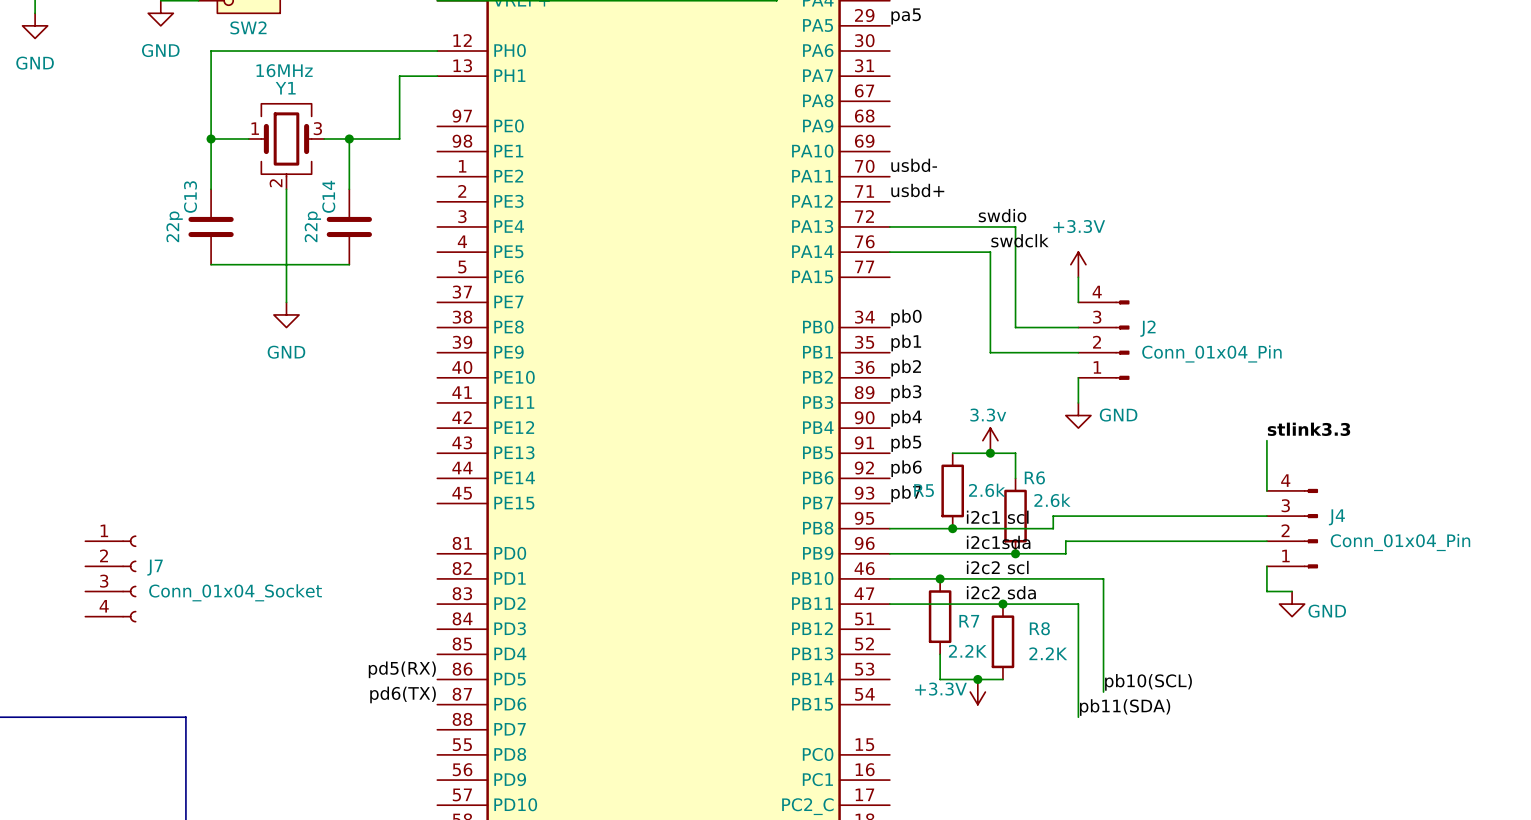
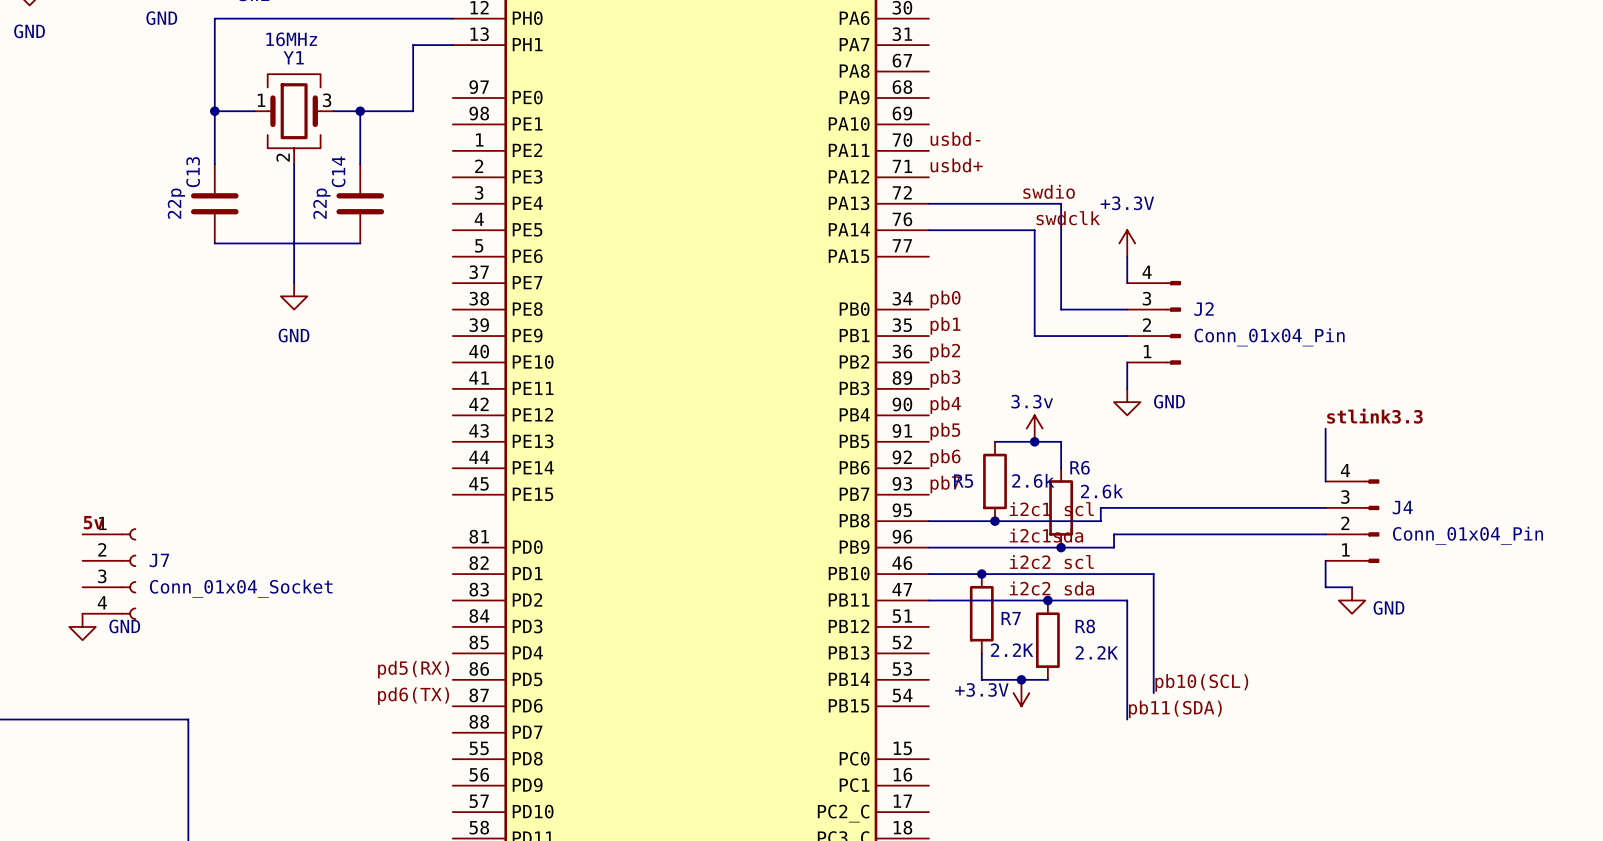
label: none -> 5v (93, 522)
power symbol: none -> GND (82, 626)

